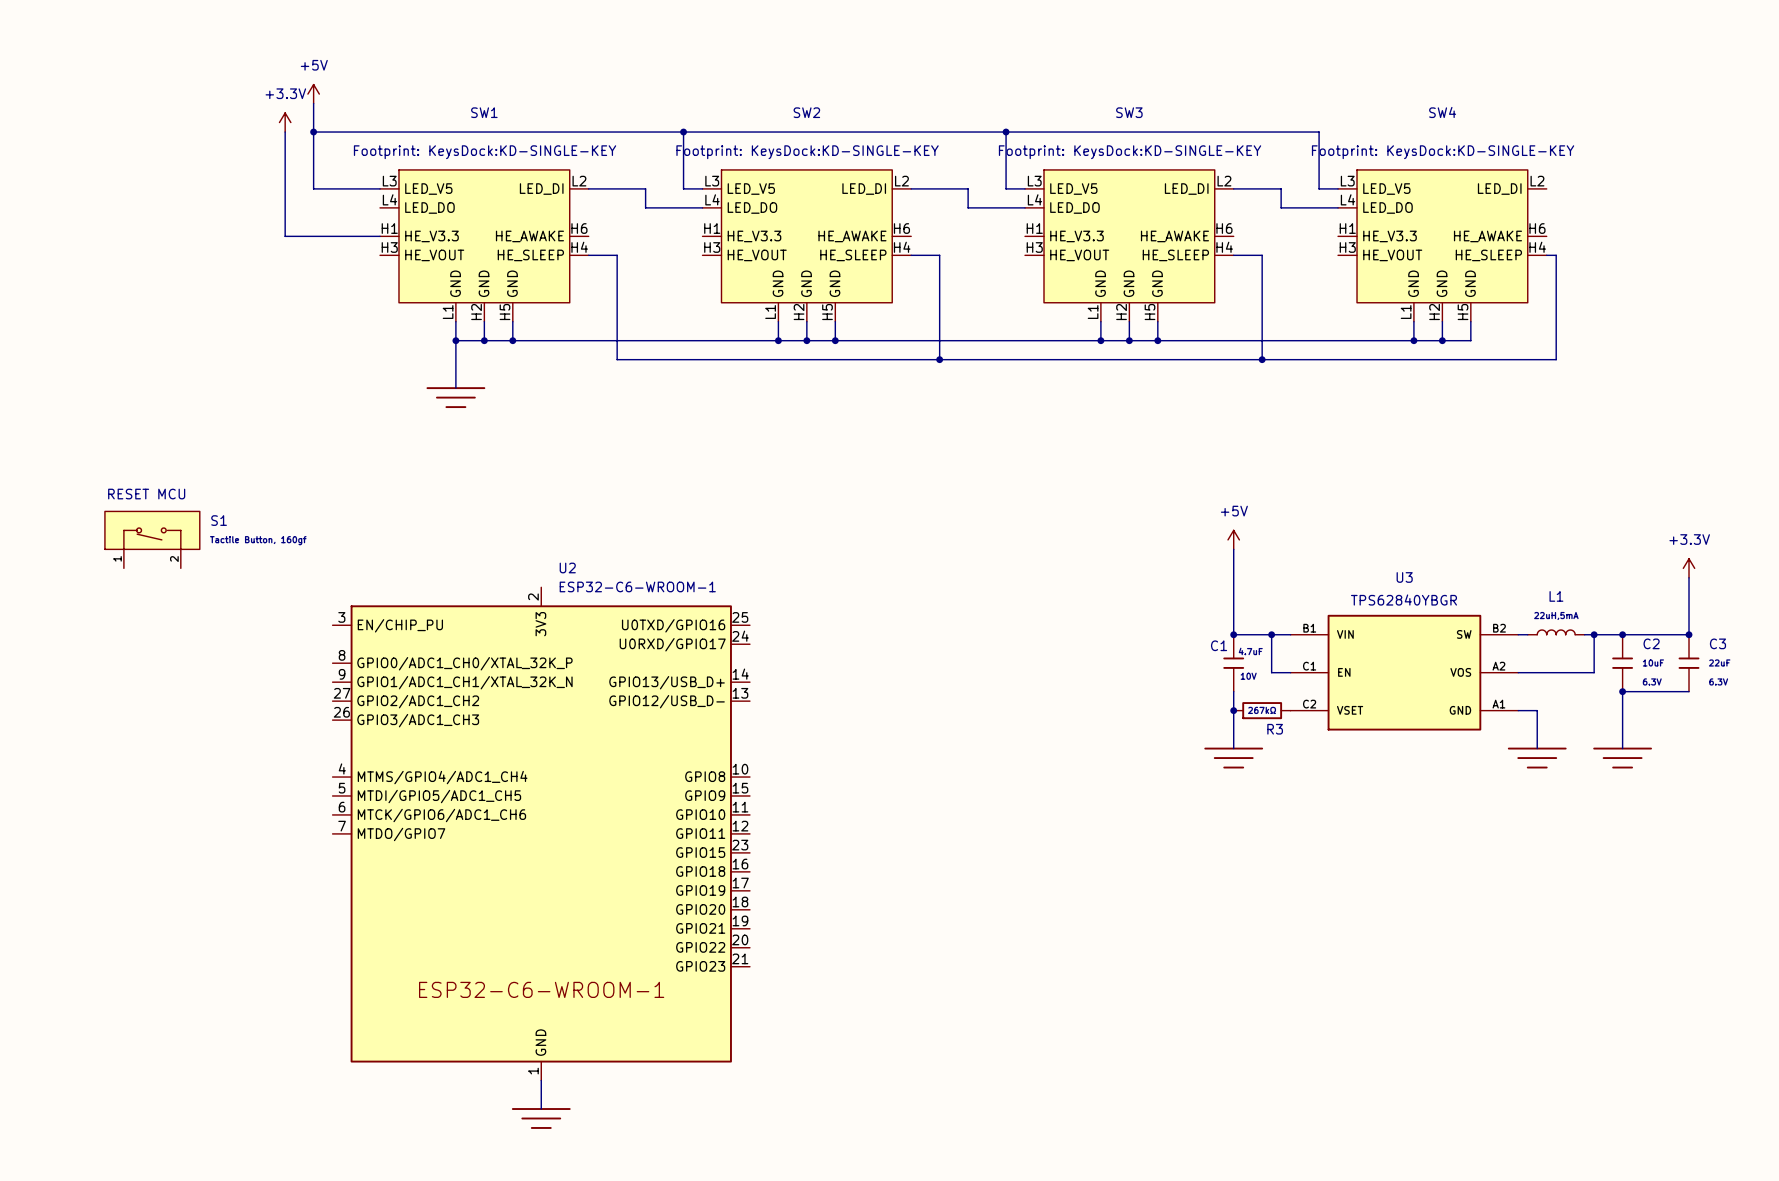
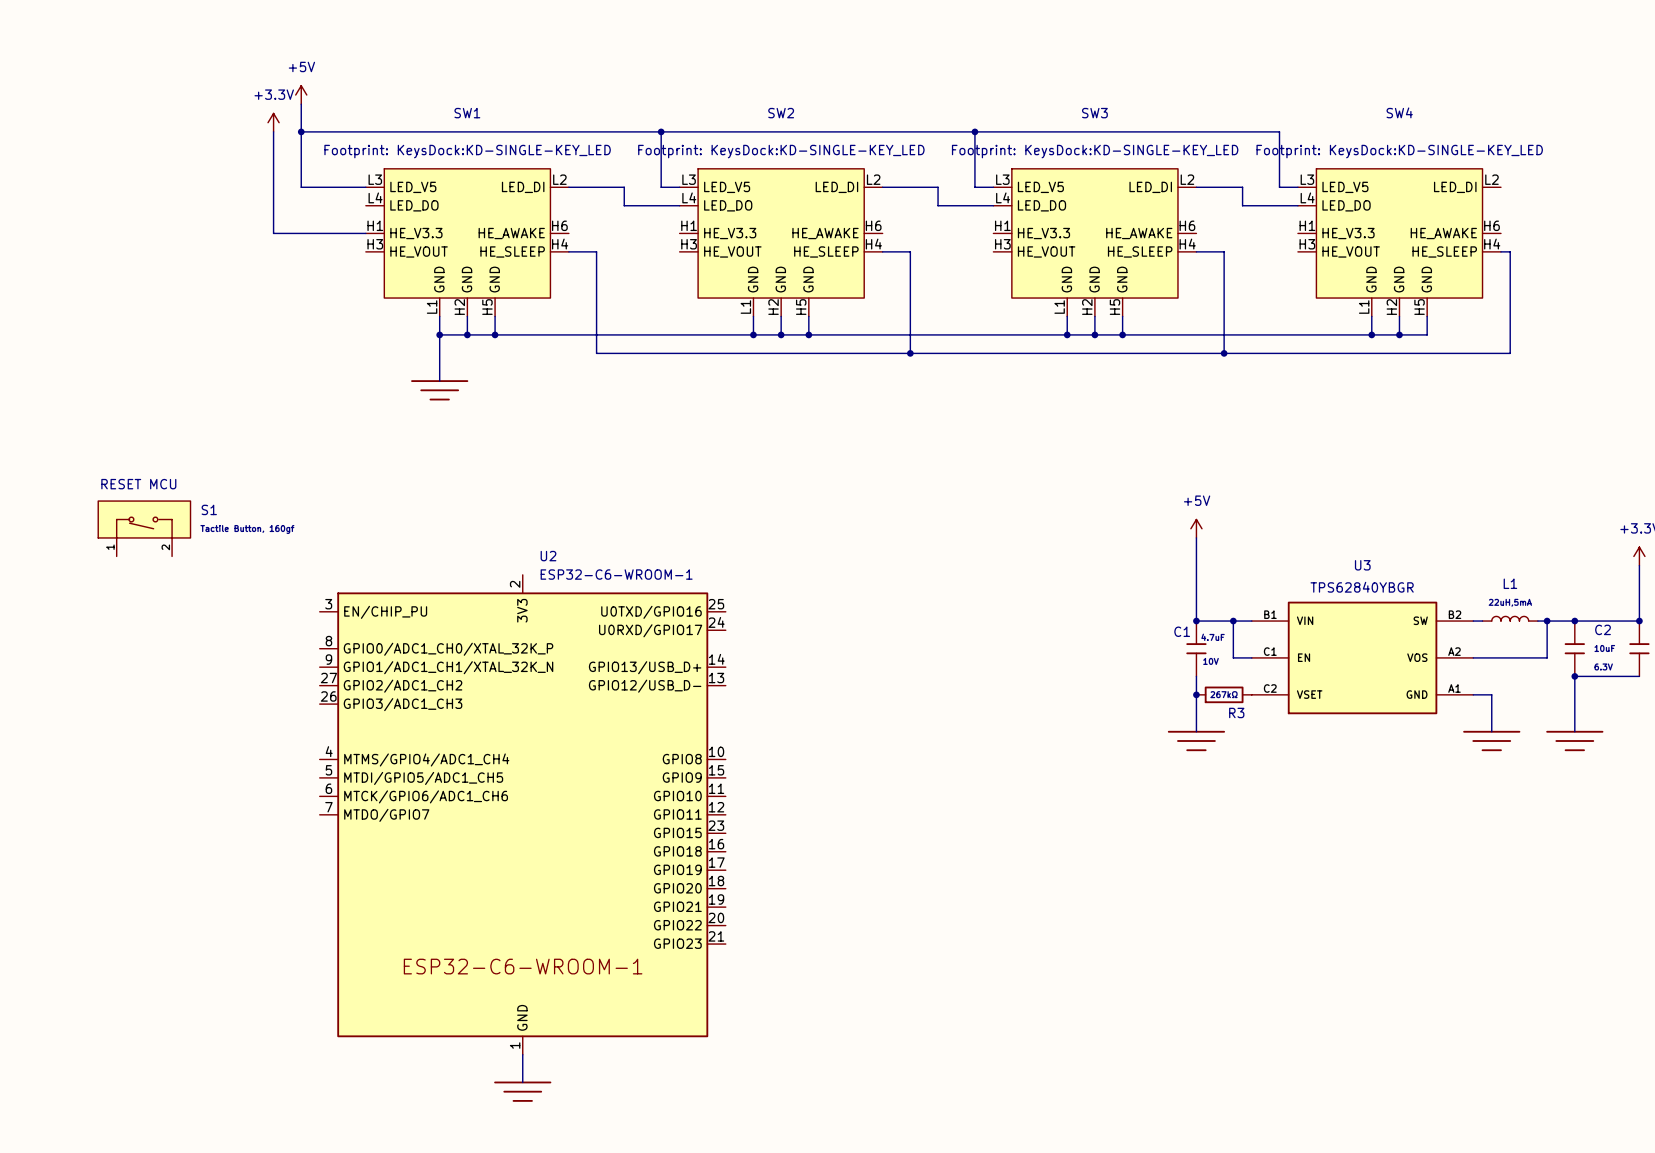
SW1 text: Footprint: KeysDock:KD-SINGLE-KEY (485, 152) -> Footprint: KeysDock:KD-SINGLE-KEY_LED (467, 151)
SW2 text: Footprint: KeysDock:KD-SINGLE-KEY (807, 152) -> Footprint: KeysDock:KD-SINGLE-KEY_LED (781, 151)
SW3 text: Footprint: KeysDock:KD-SINGLE-KEY (1130, 152) -> Footprint: KeysDock:KD-SINGLE-KEY_LED (1095, 151)
SW4 text: Footprint: KeysDock:KD-SINGLE-KEY (1443, 152) -> Footprint: KeysDock:KD-SINGLE-KEY_LED (1399, 151)

